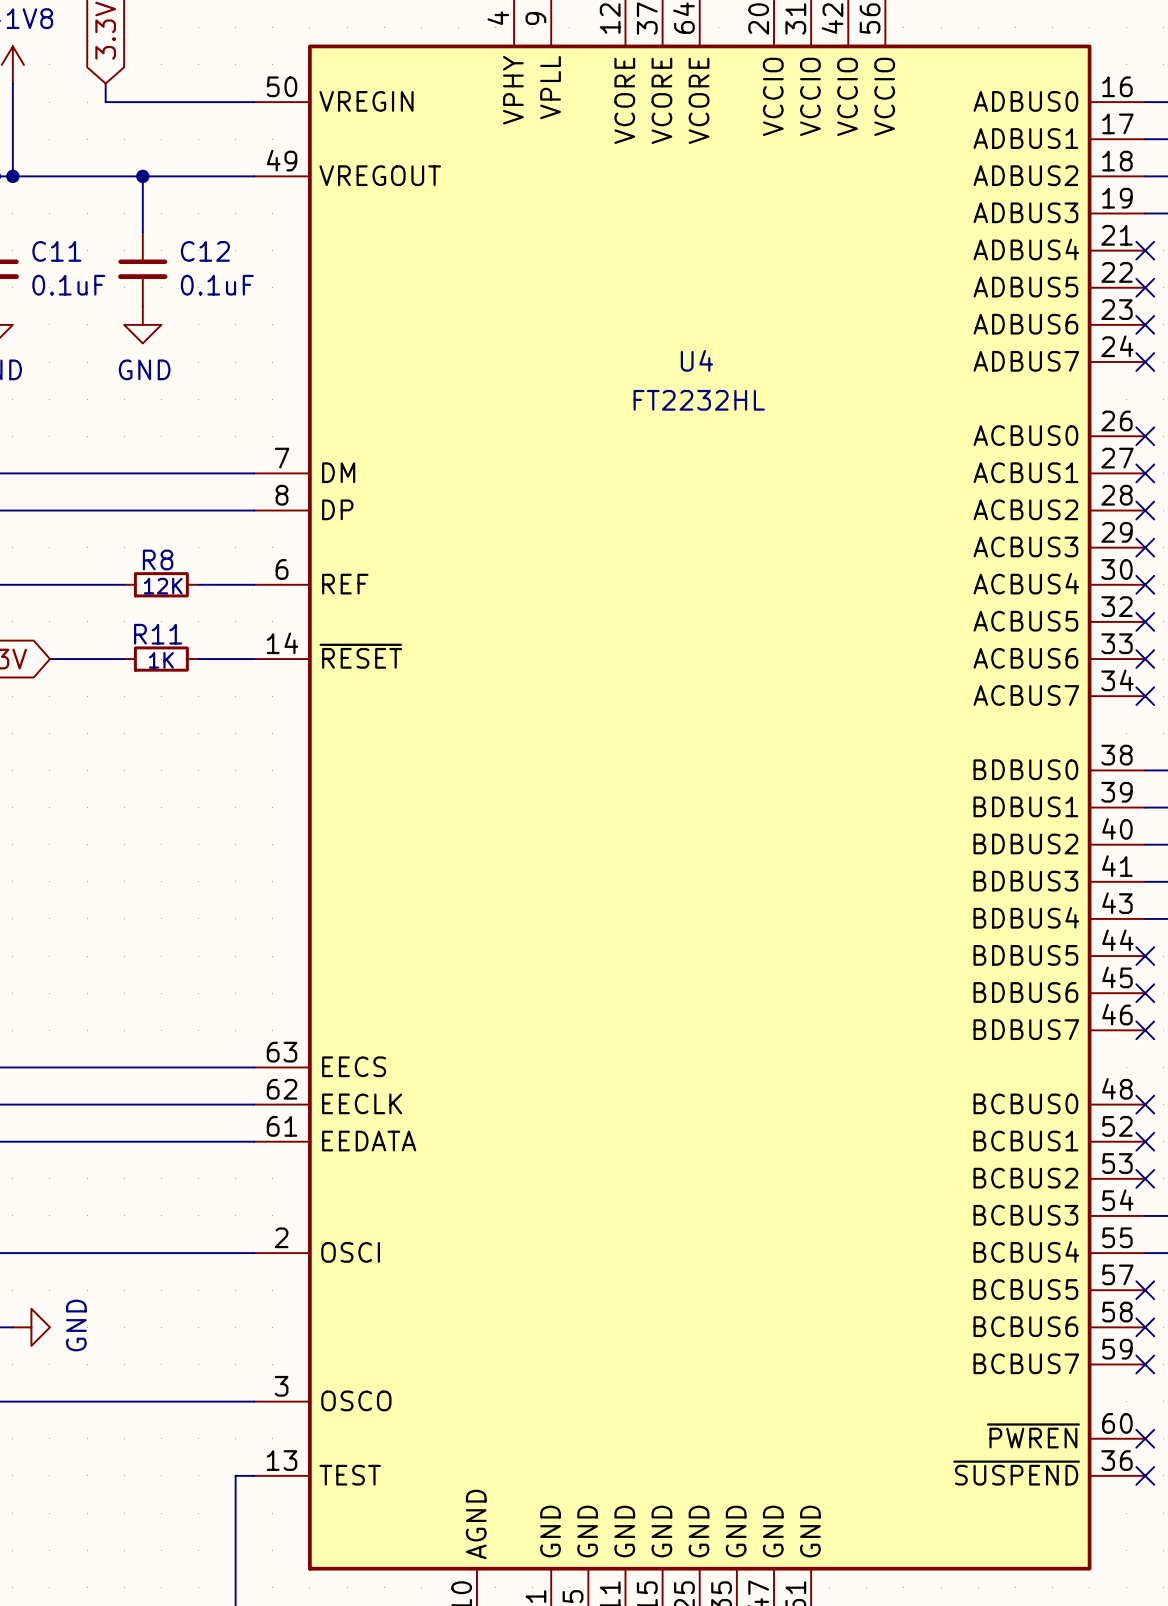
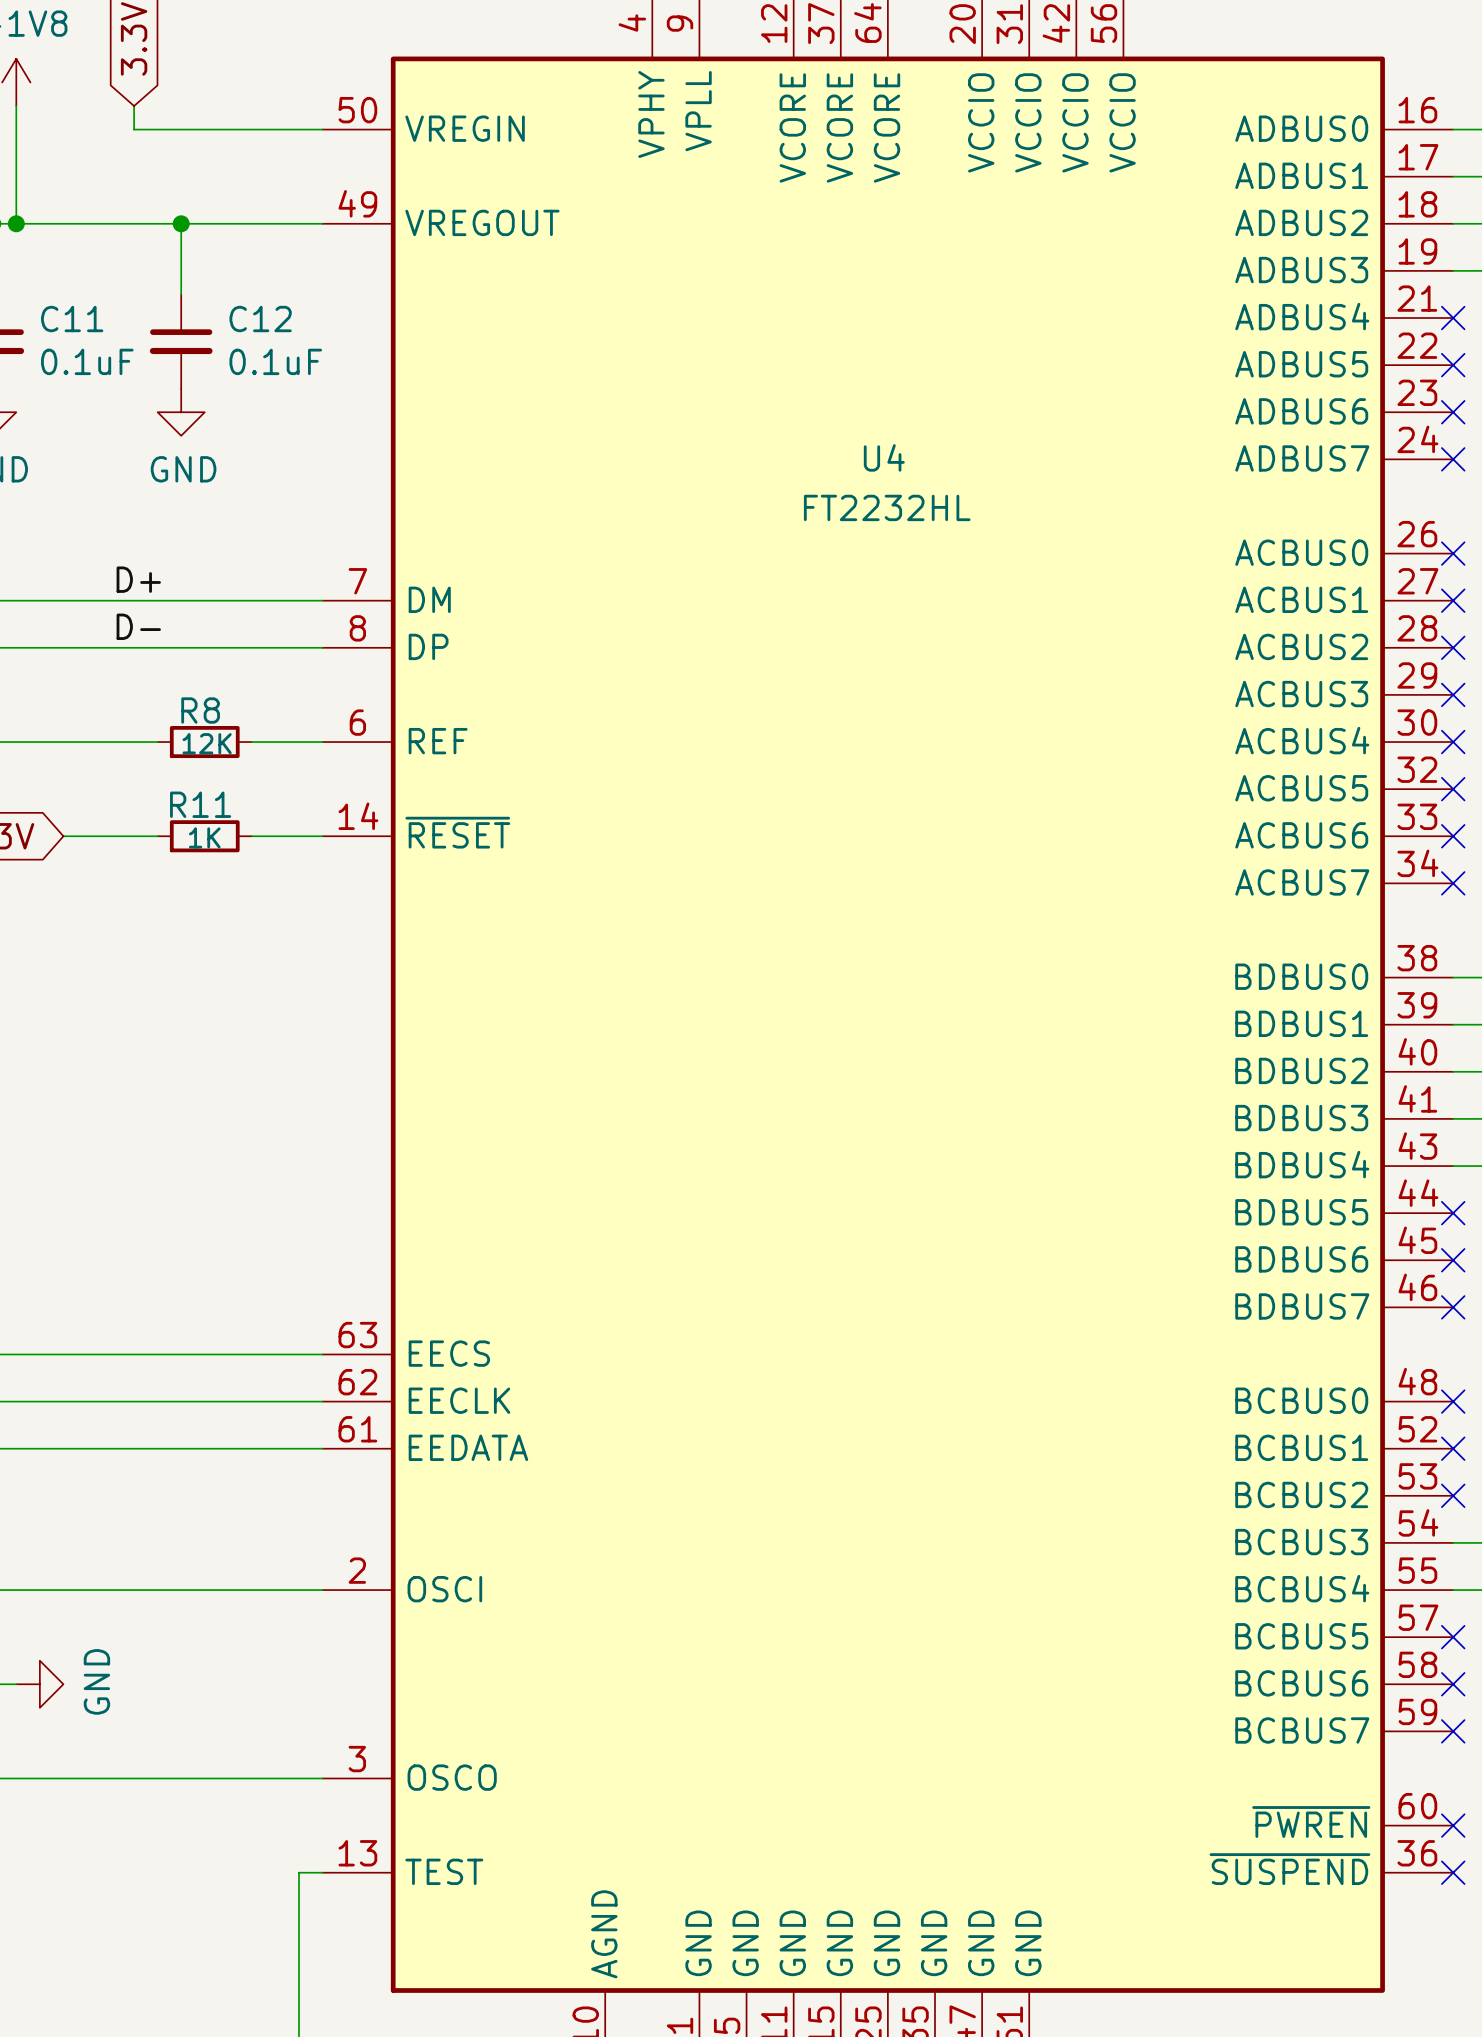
label: none -> D+ (138, 579)
label: none -> D- (138, 626)

